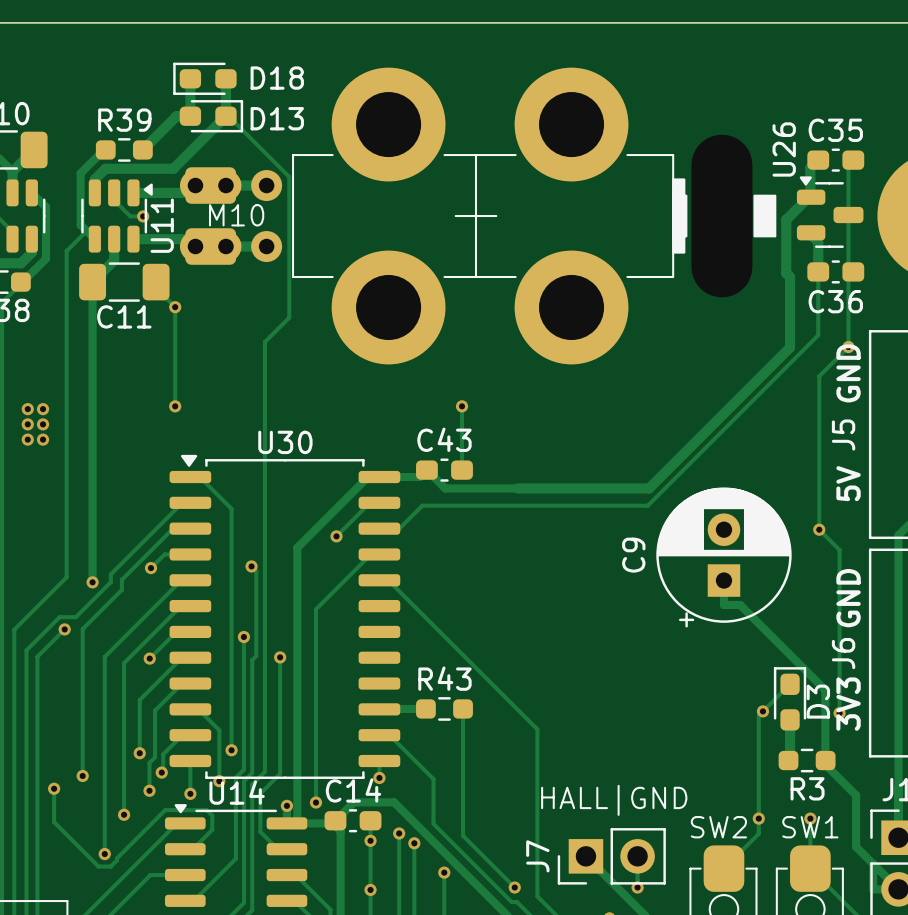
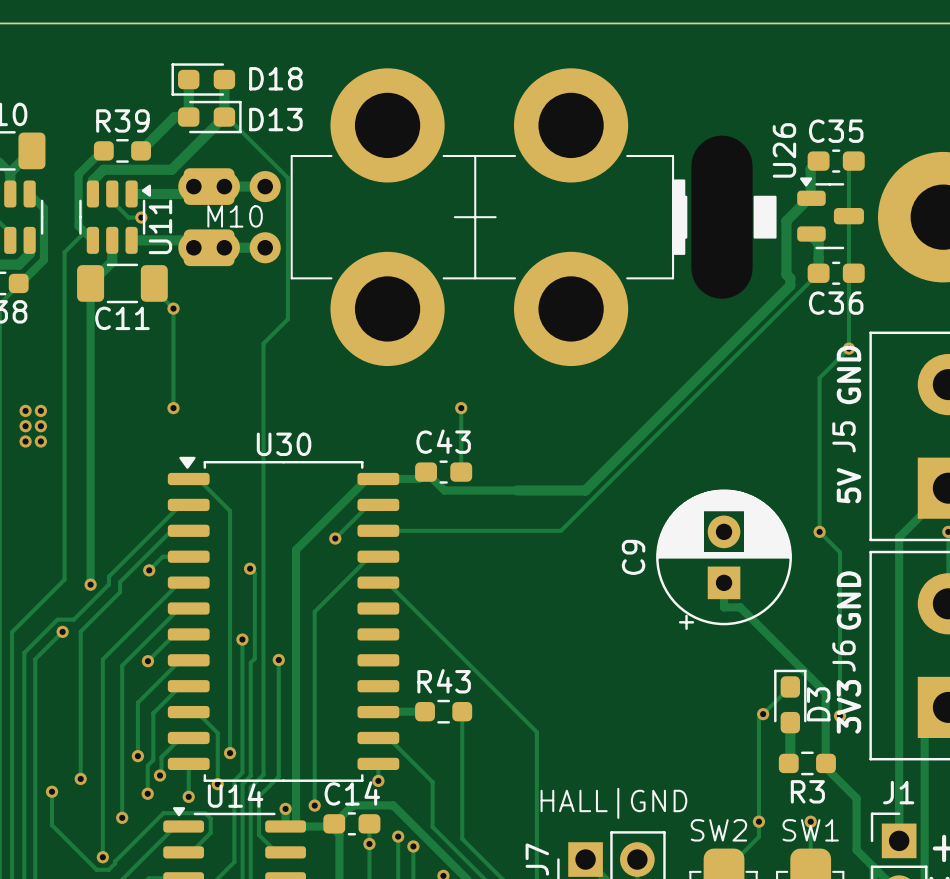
track: (818, 271) (818, 335) (647, 505) (422, 505) (399, 528) -> (818, 273) (561, 530) (398, 530)
track: (790, 284) (790, 347) (649, 488) (585, 488) -> (790, 285) (585, 490)

